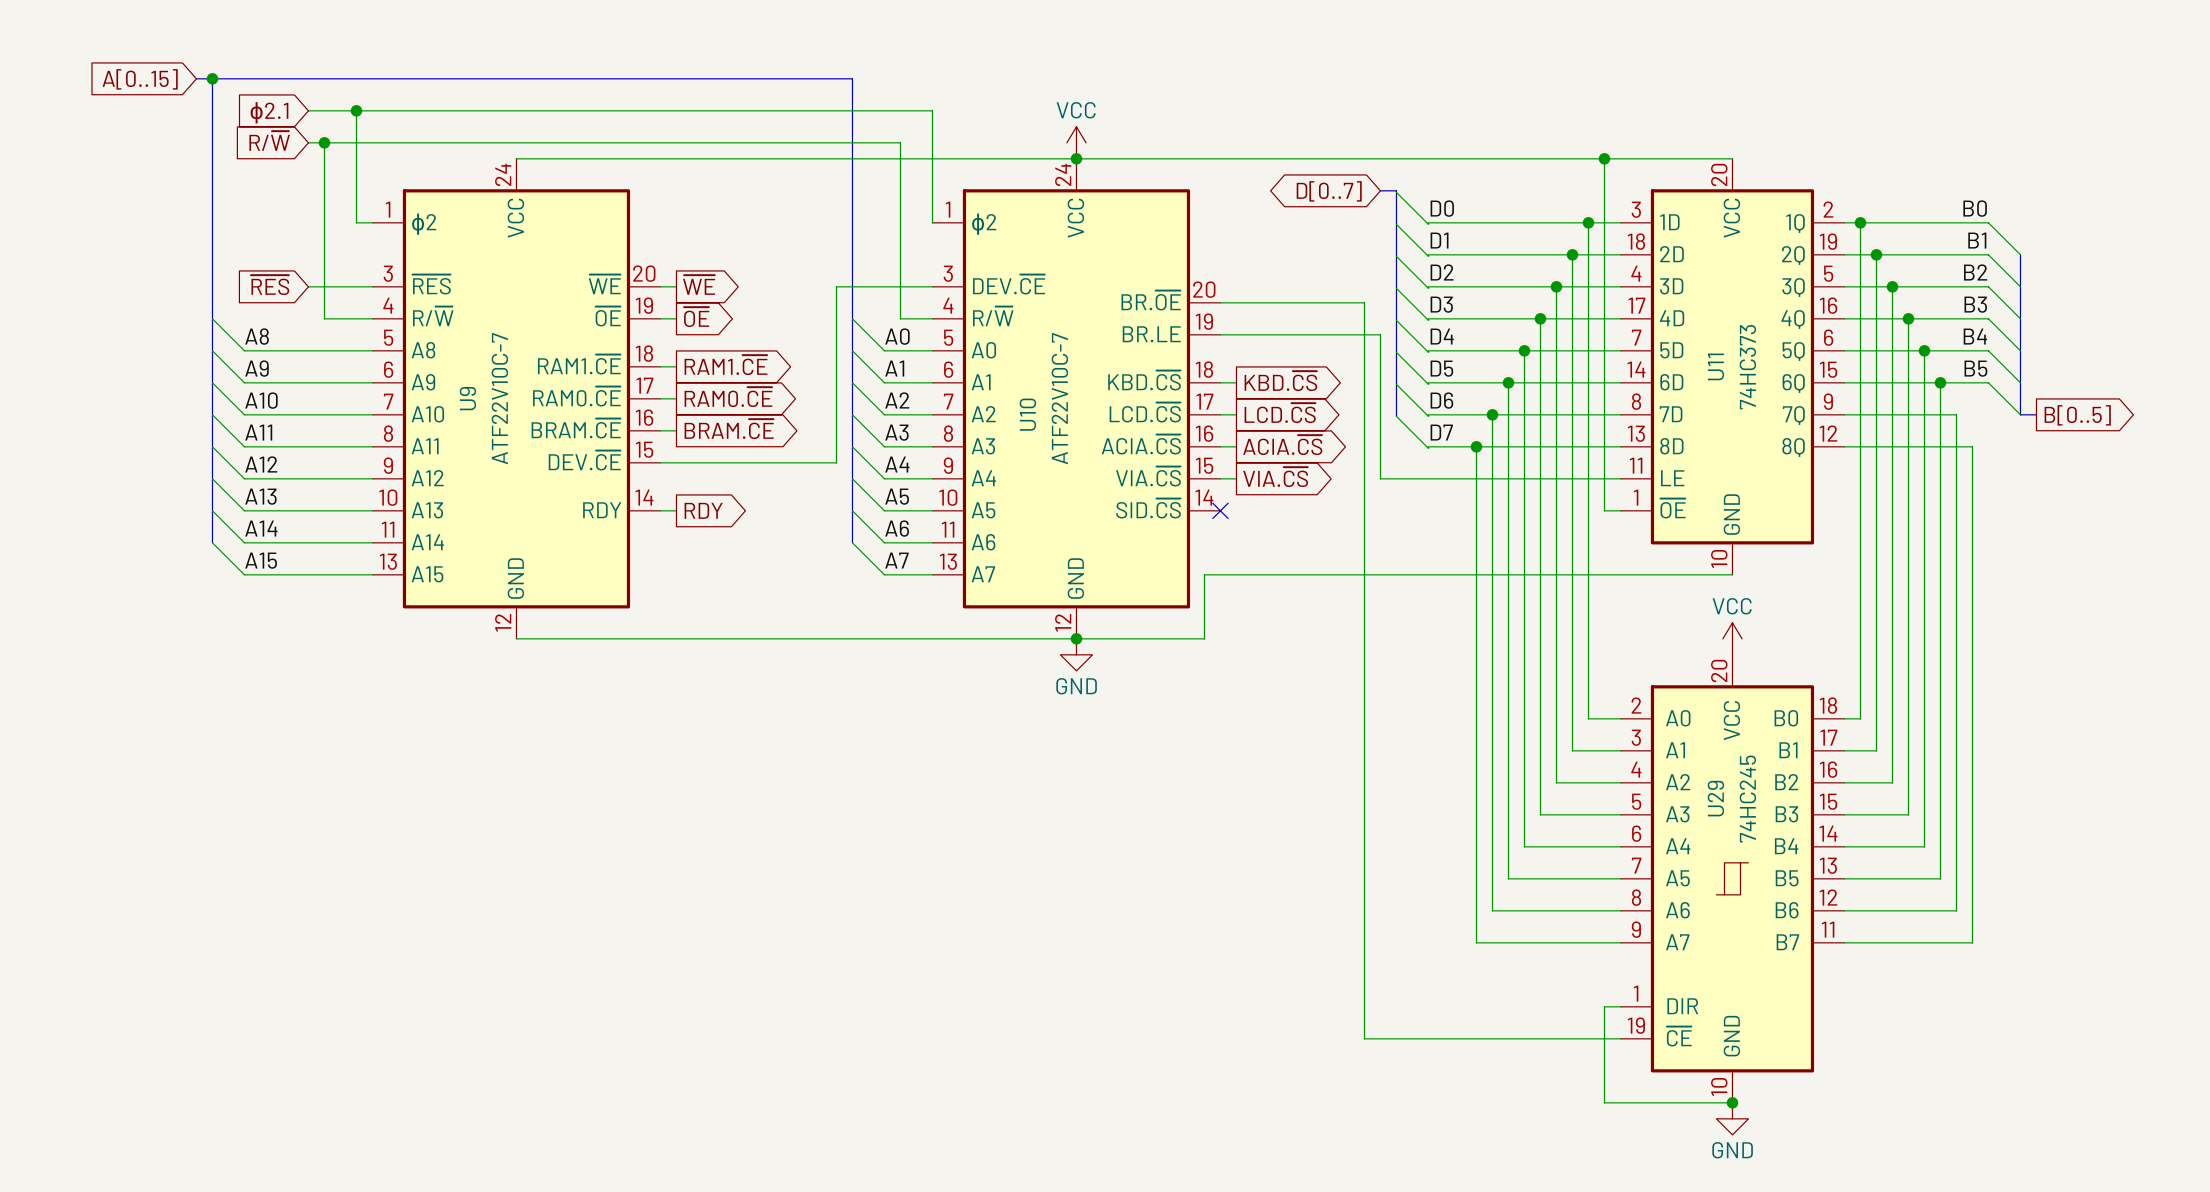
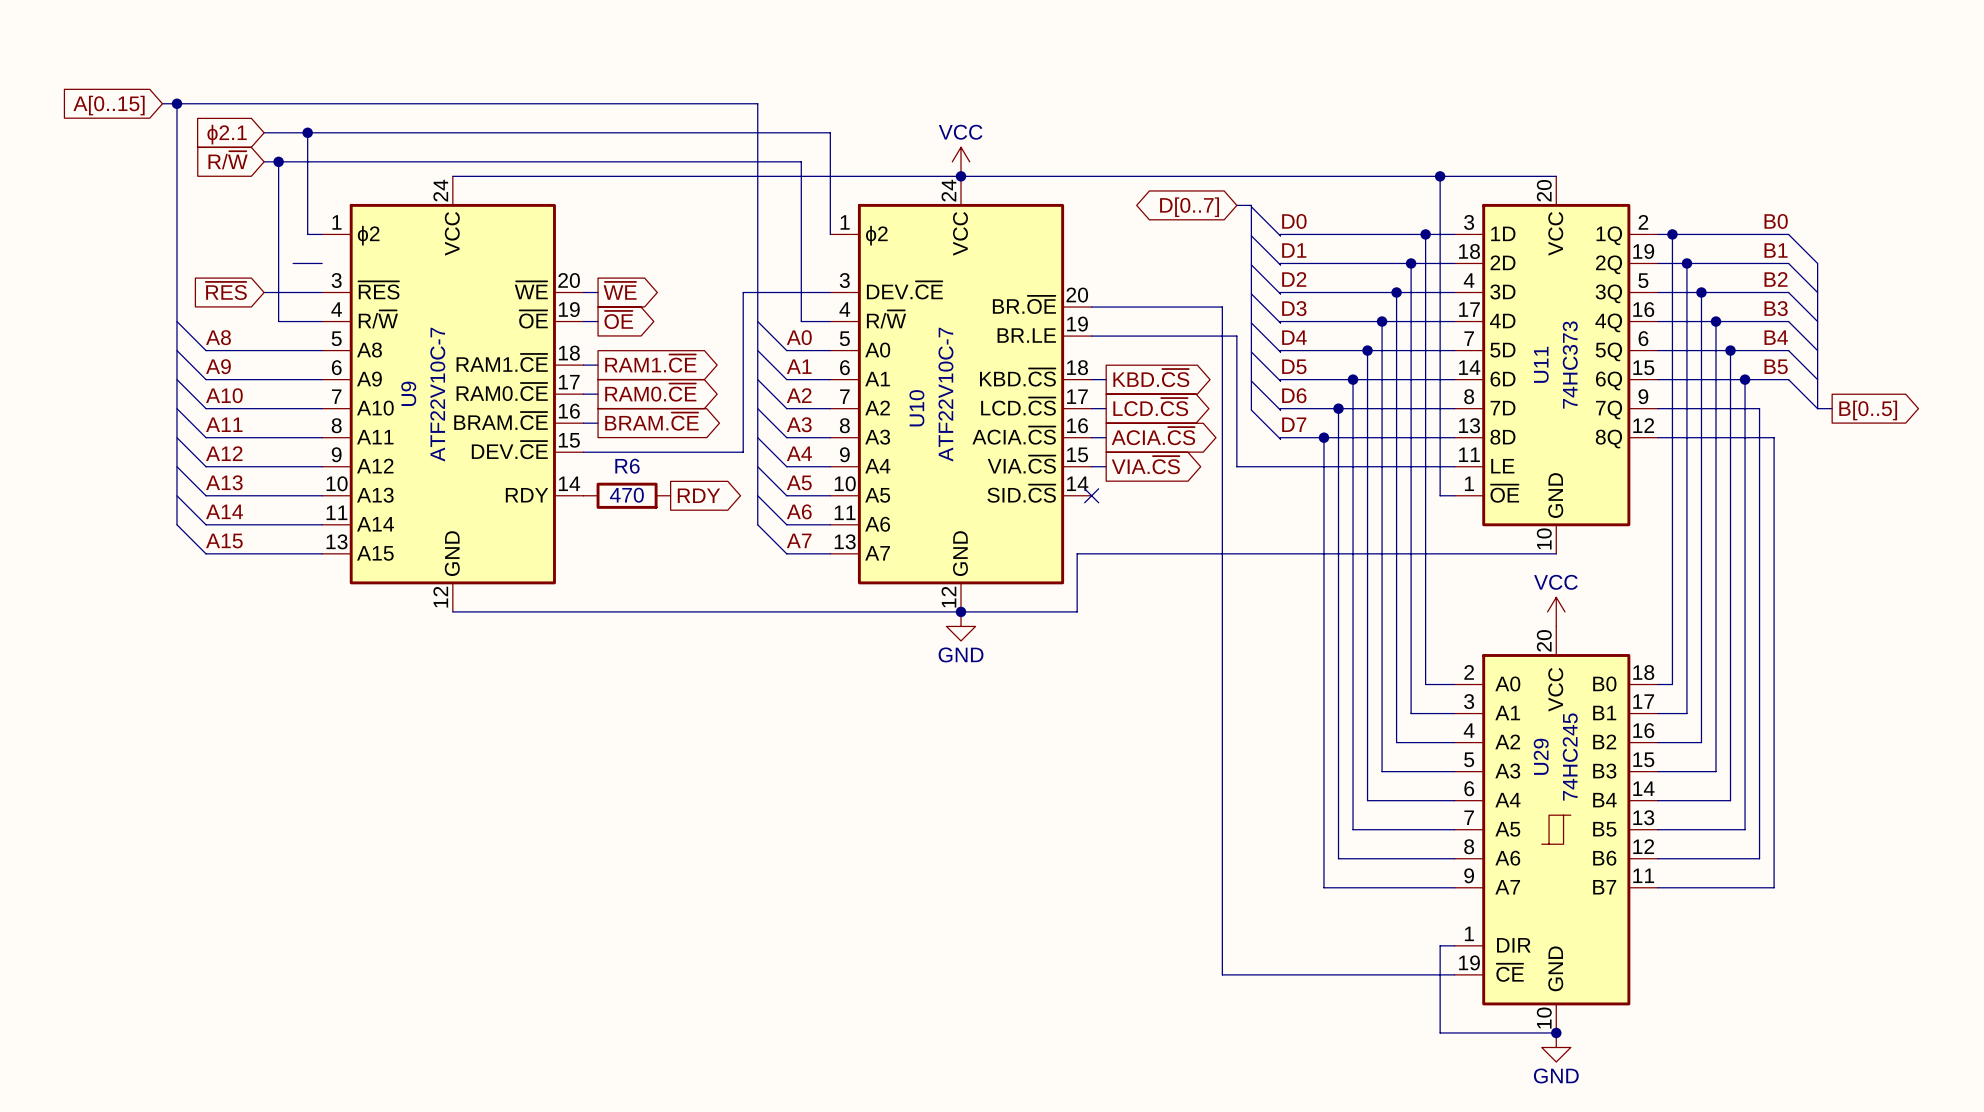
wire: none -> (293, 263) (322, 263)
global label position: RDY (703, 510) -> RDY (698, 495)
R6: none -> 470 (627, 495)

